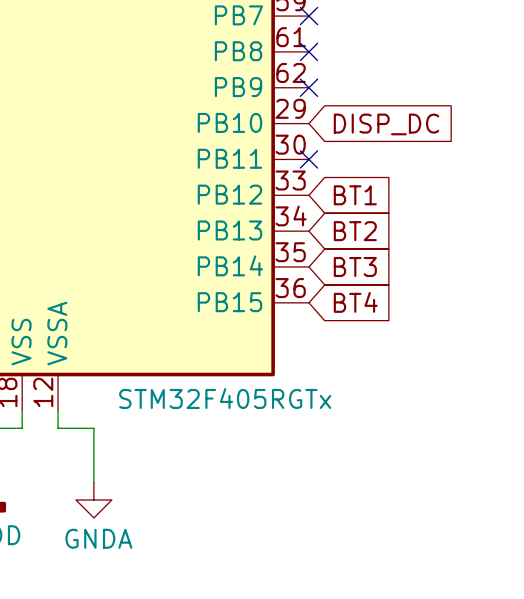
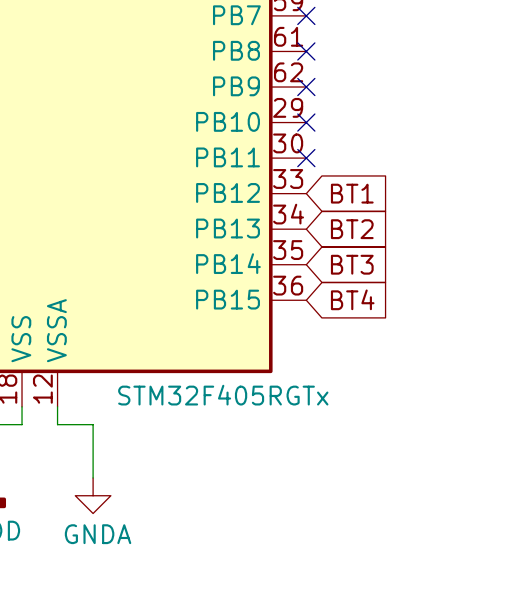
no-connect mark: none -> (306, 122)
global label: DISP_DC (386, 124) -> none

